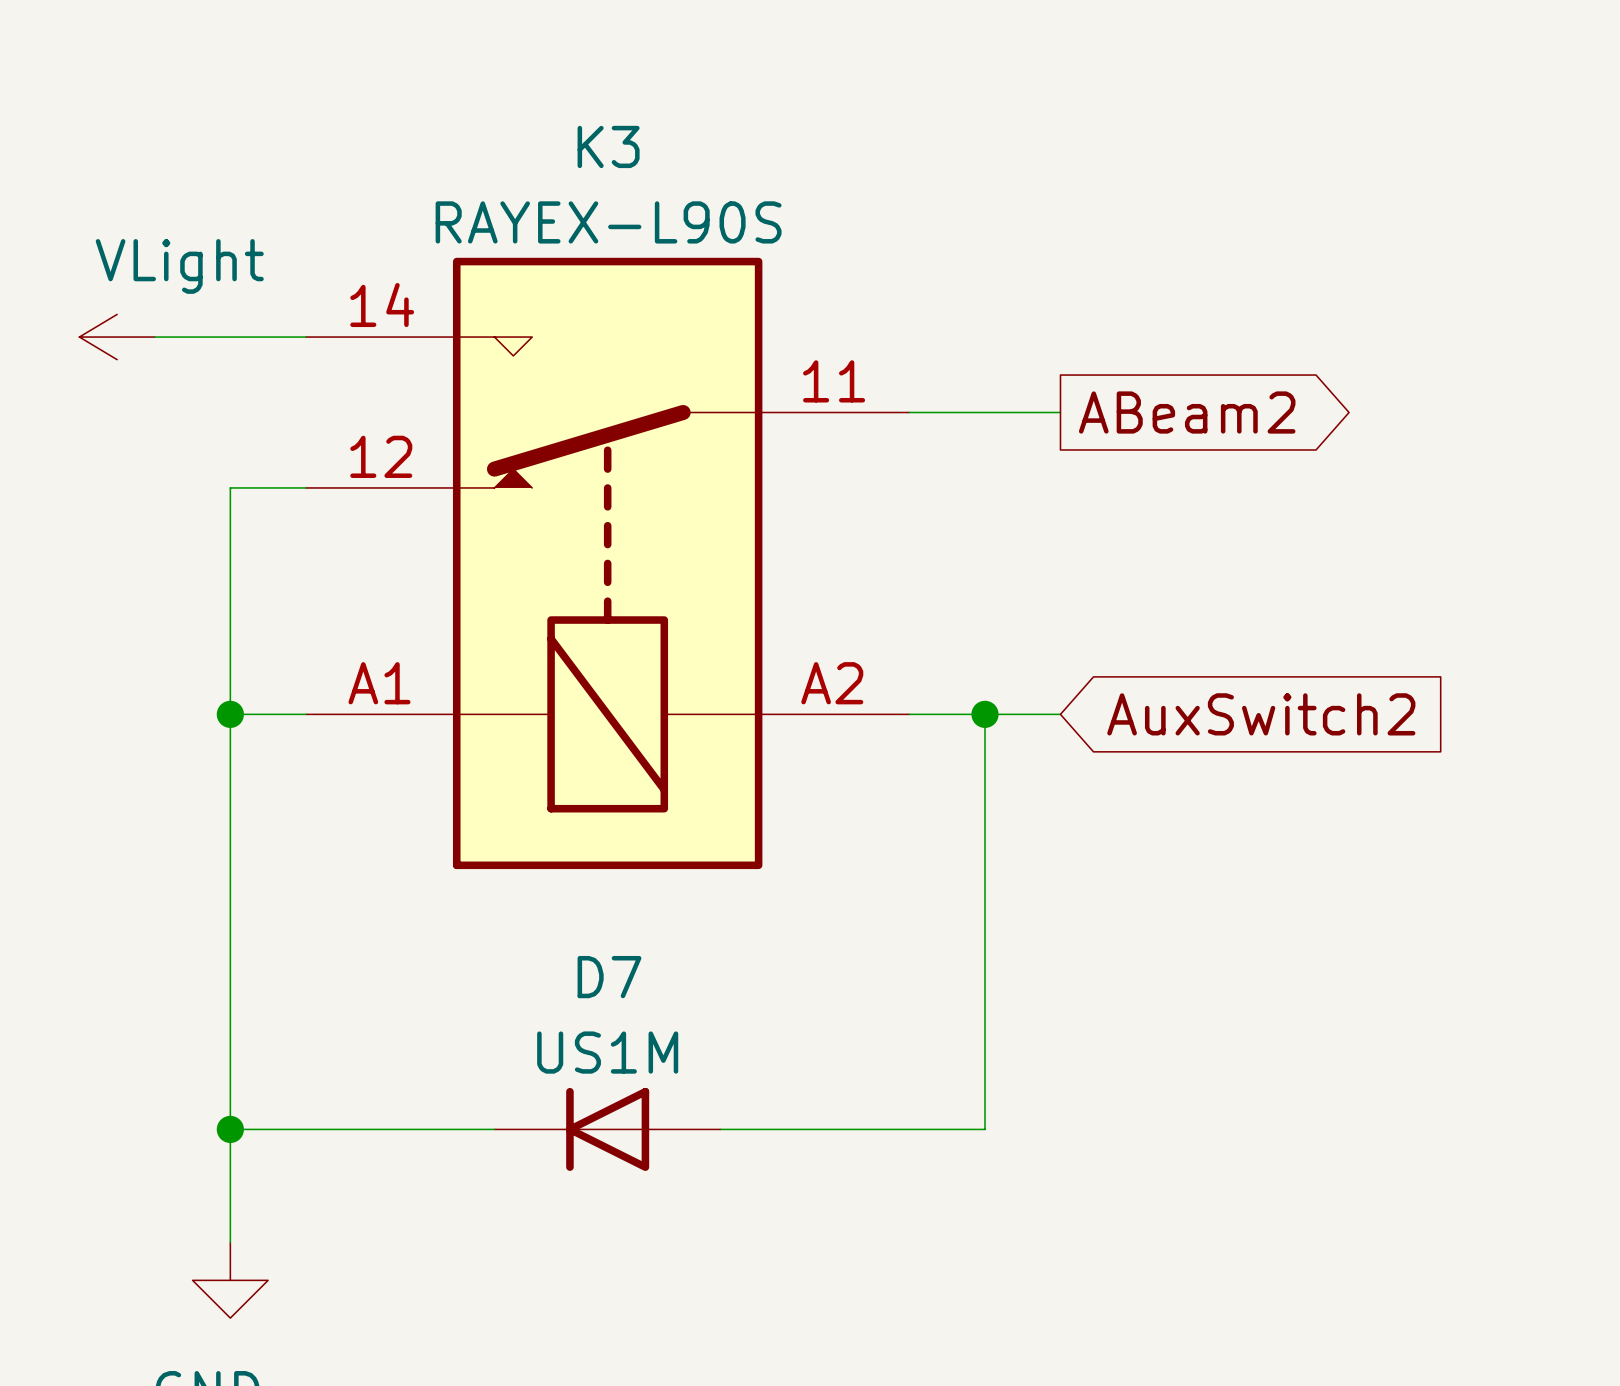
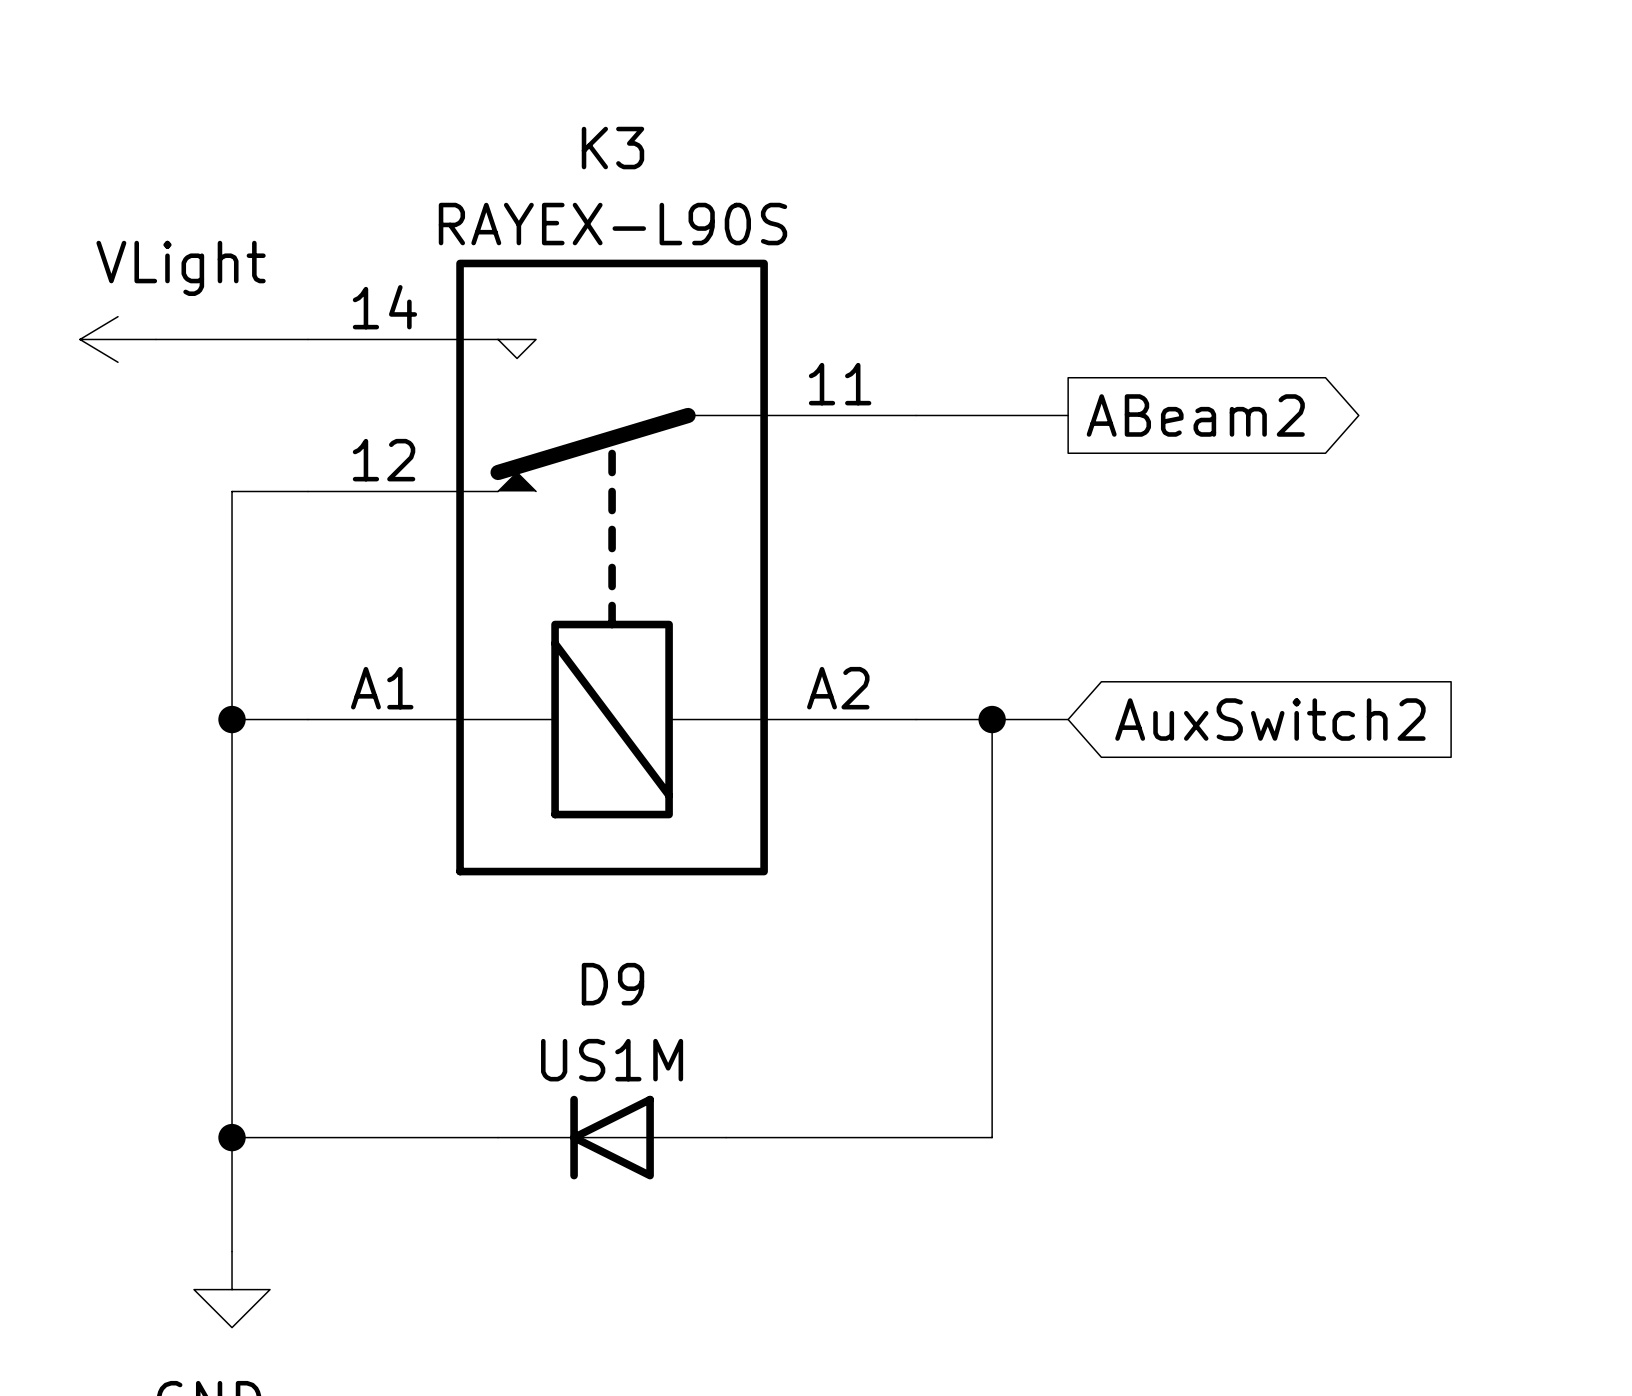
D7 name: D7 (609, 977) -> D9 (612, 984)

